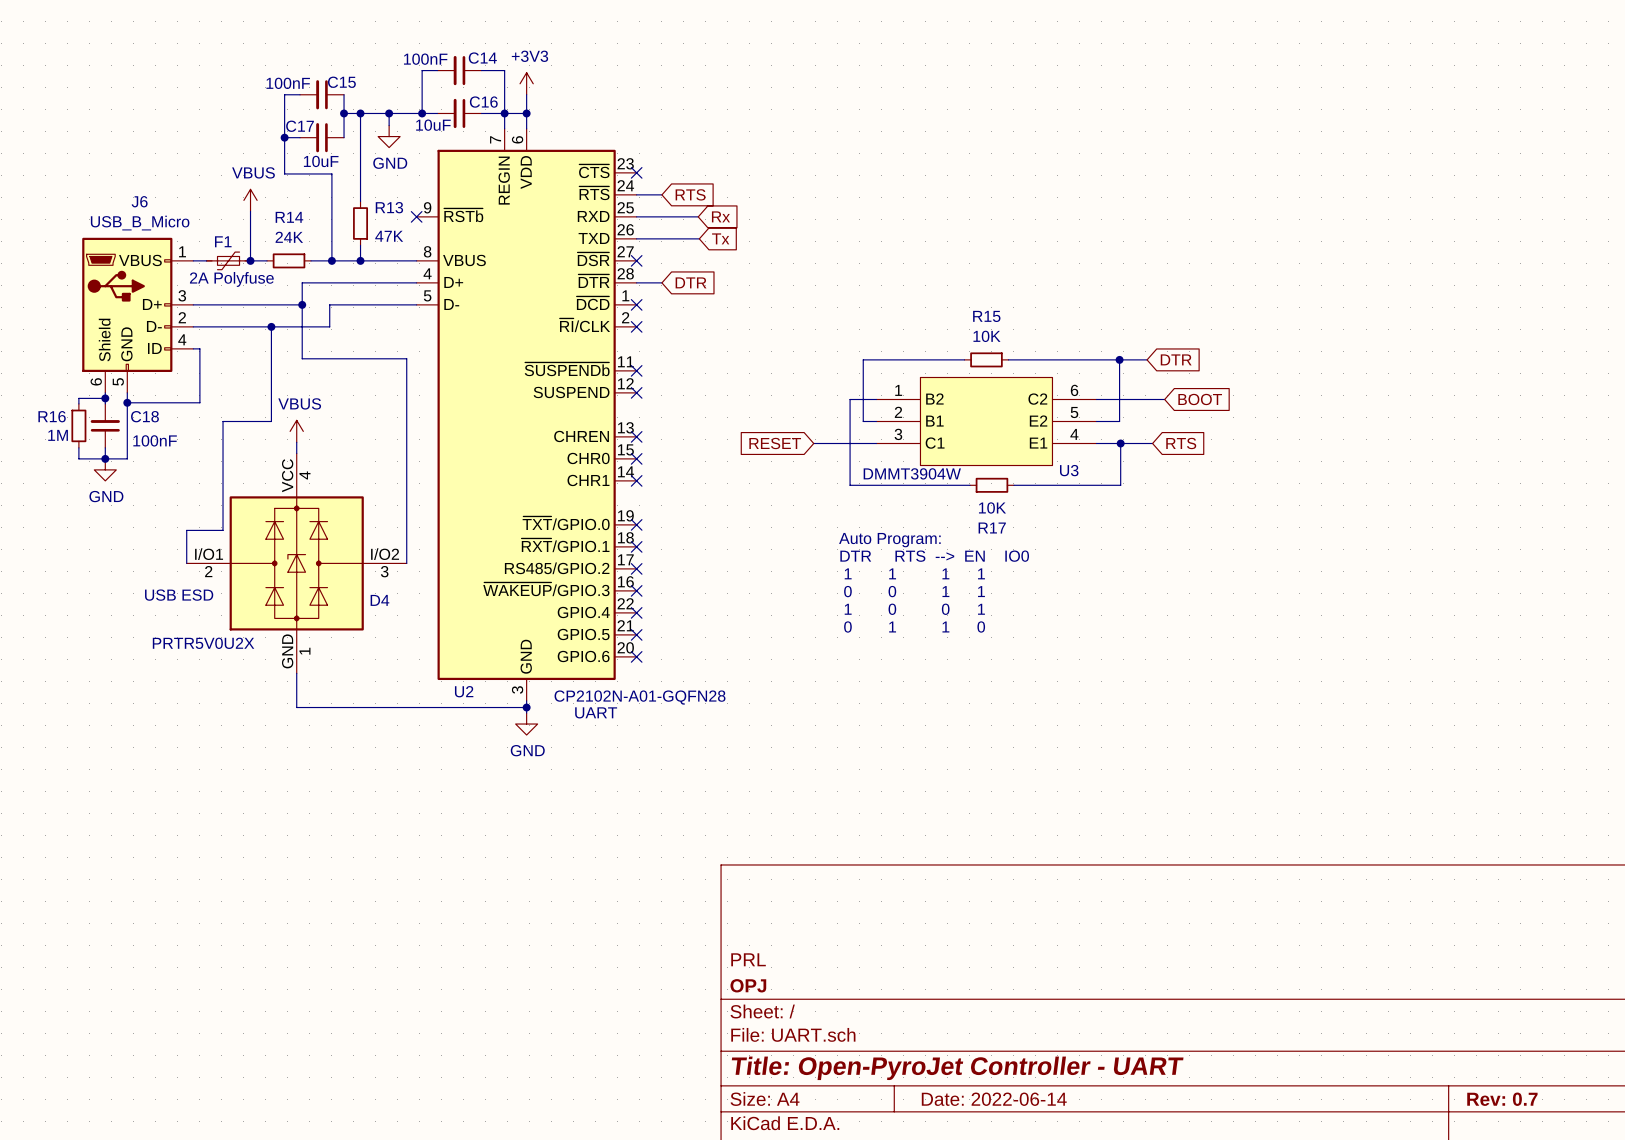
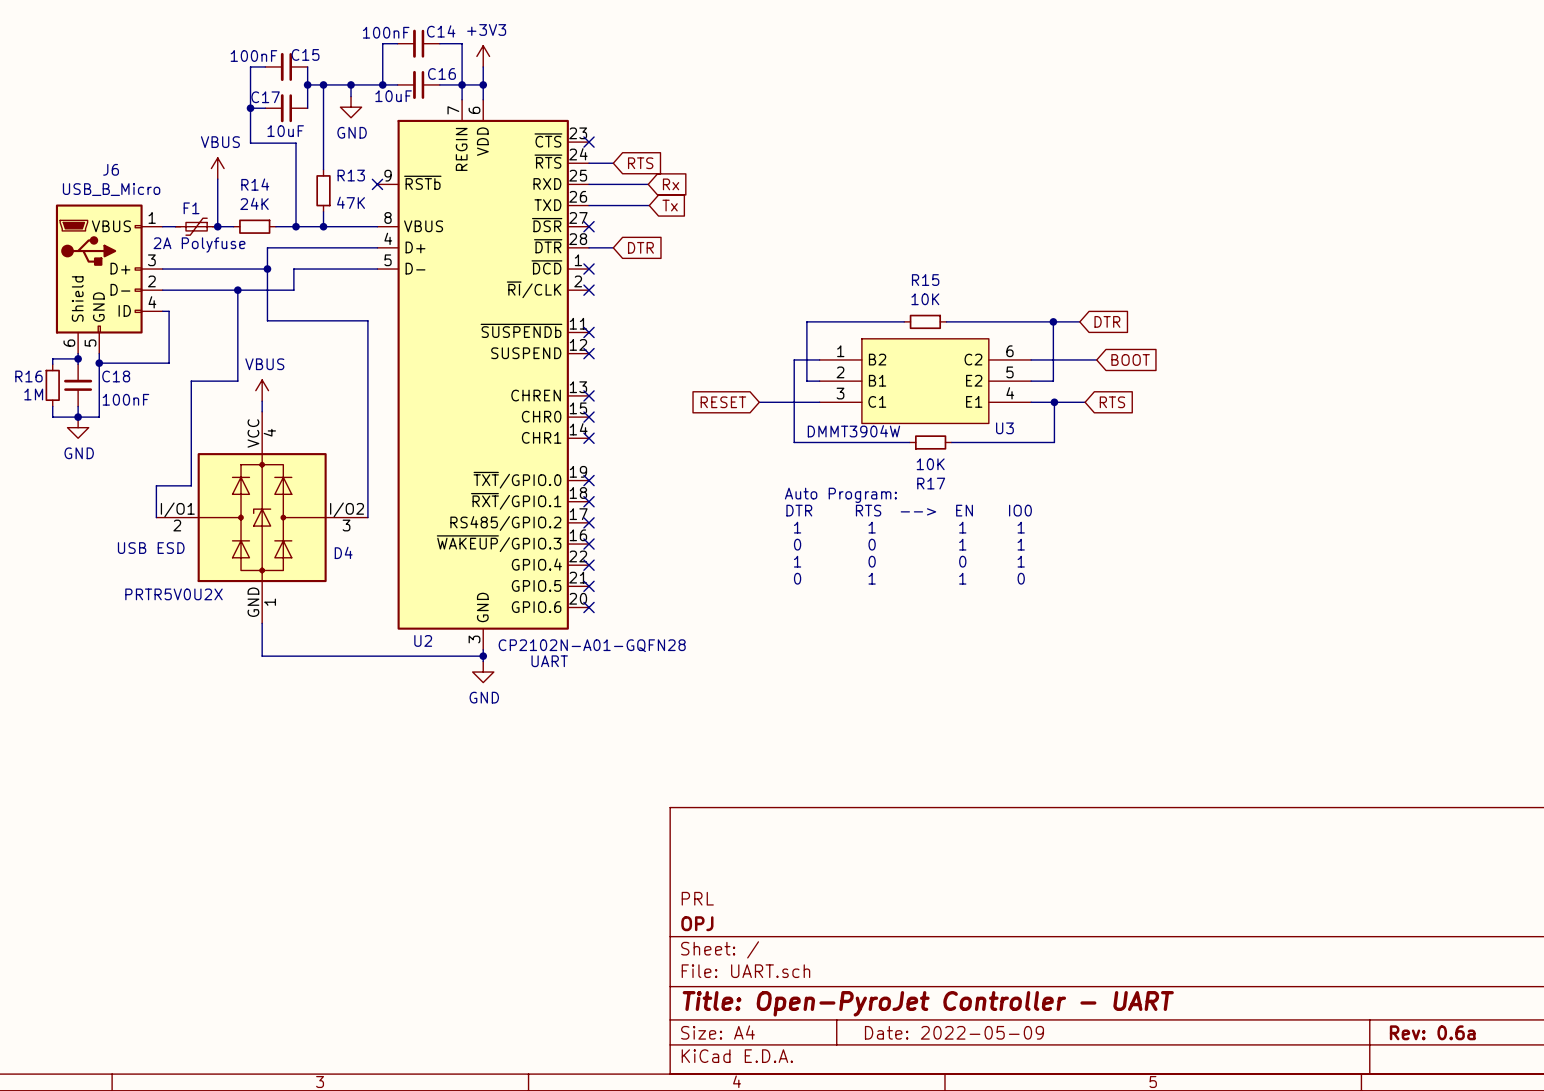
title block: Date: 2022-06-14 (994, 1099) -> Date: 2022-05-09 (954, 1032)
title block: Rev: 0.7 (1502, 1099) -> Rev: 0.6a (1432, 1032)

